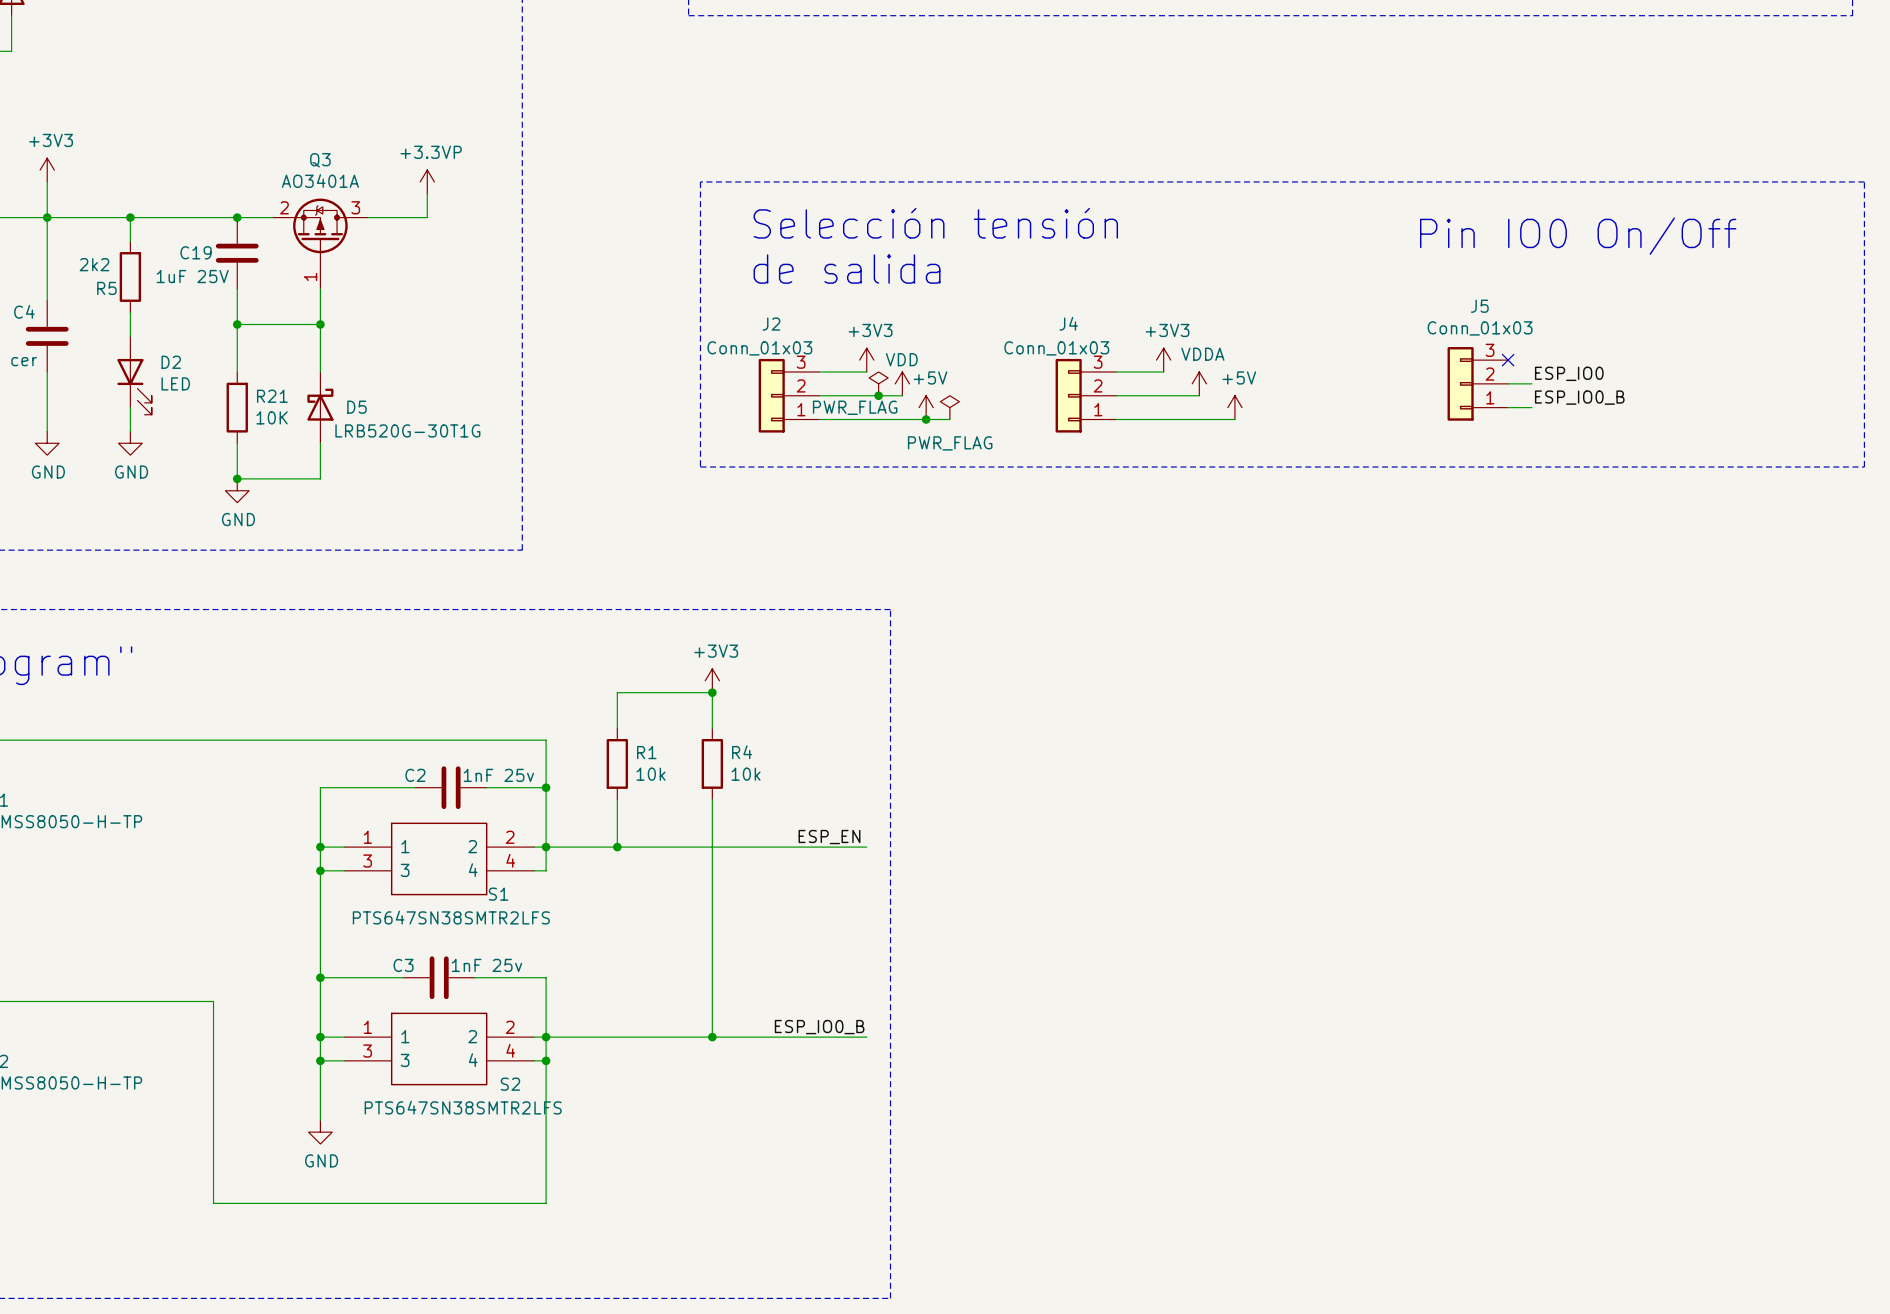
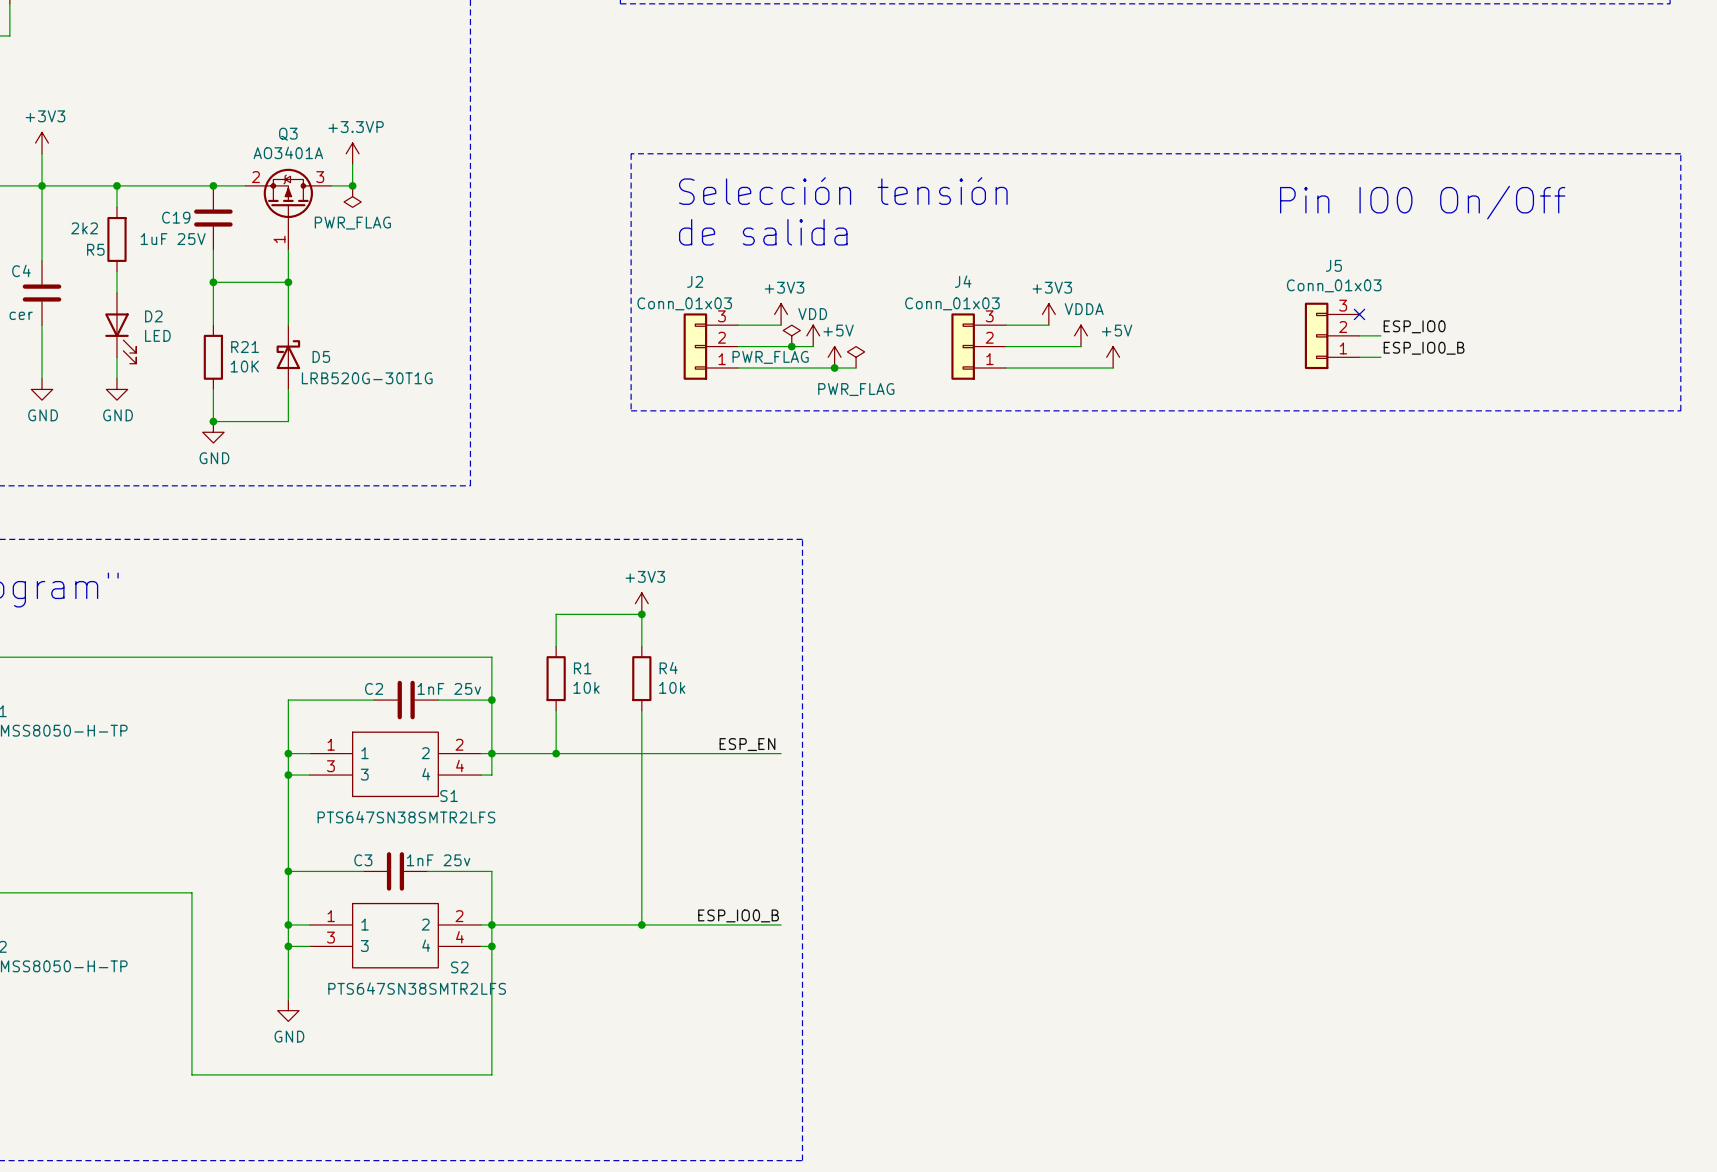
power symbol position: +3.3VP (427, 181) -> +3.3VP (352, 153)
wire: (427, 193) (427, 217) (391, 217) -> (352, 164) (352, 185)
junction: none -> (352, 185)
power symbol: none -> PWR_FLAG (352, 196)

